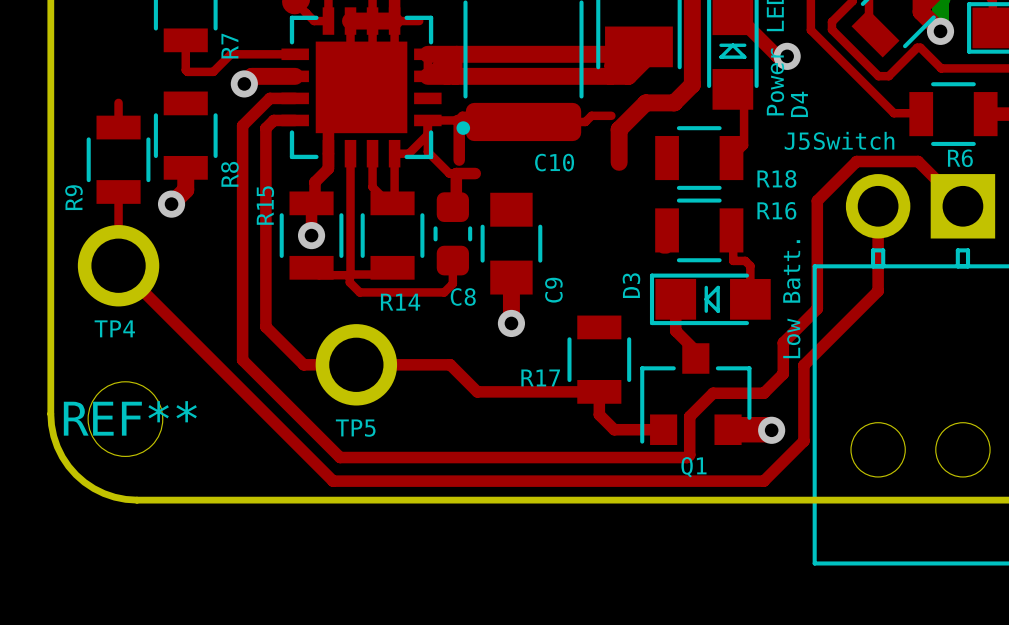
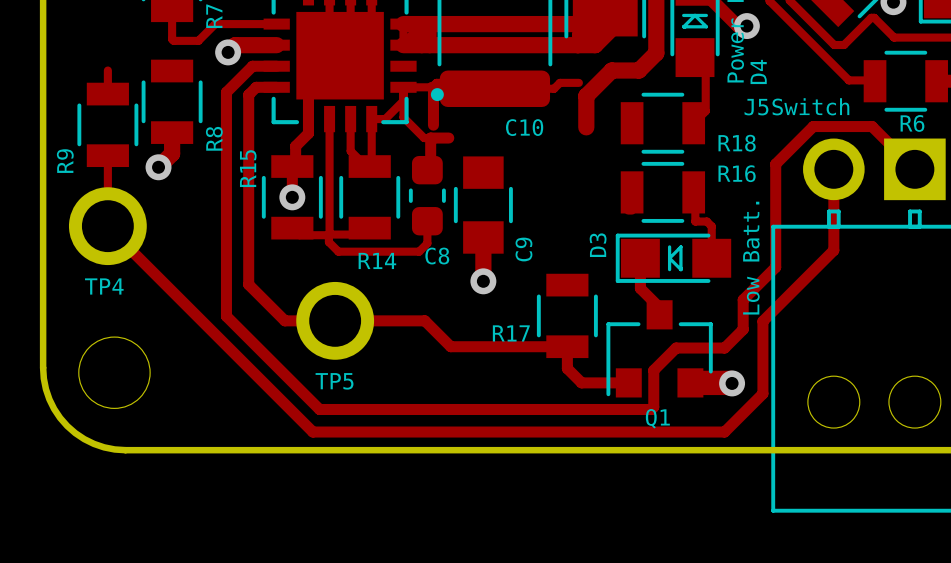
REF** name: REF** (130, 418) -> none

